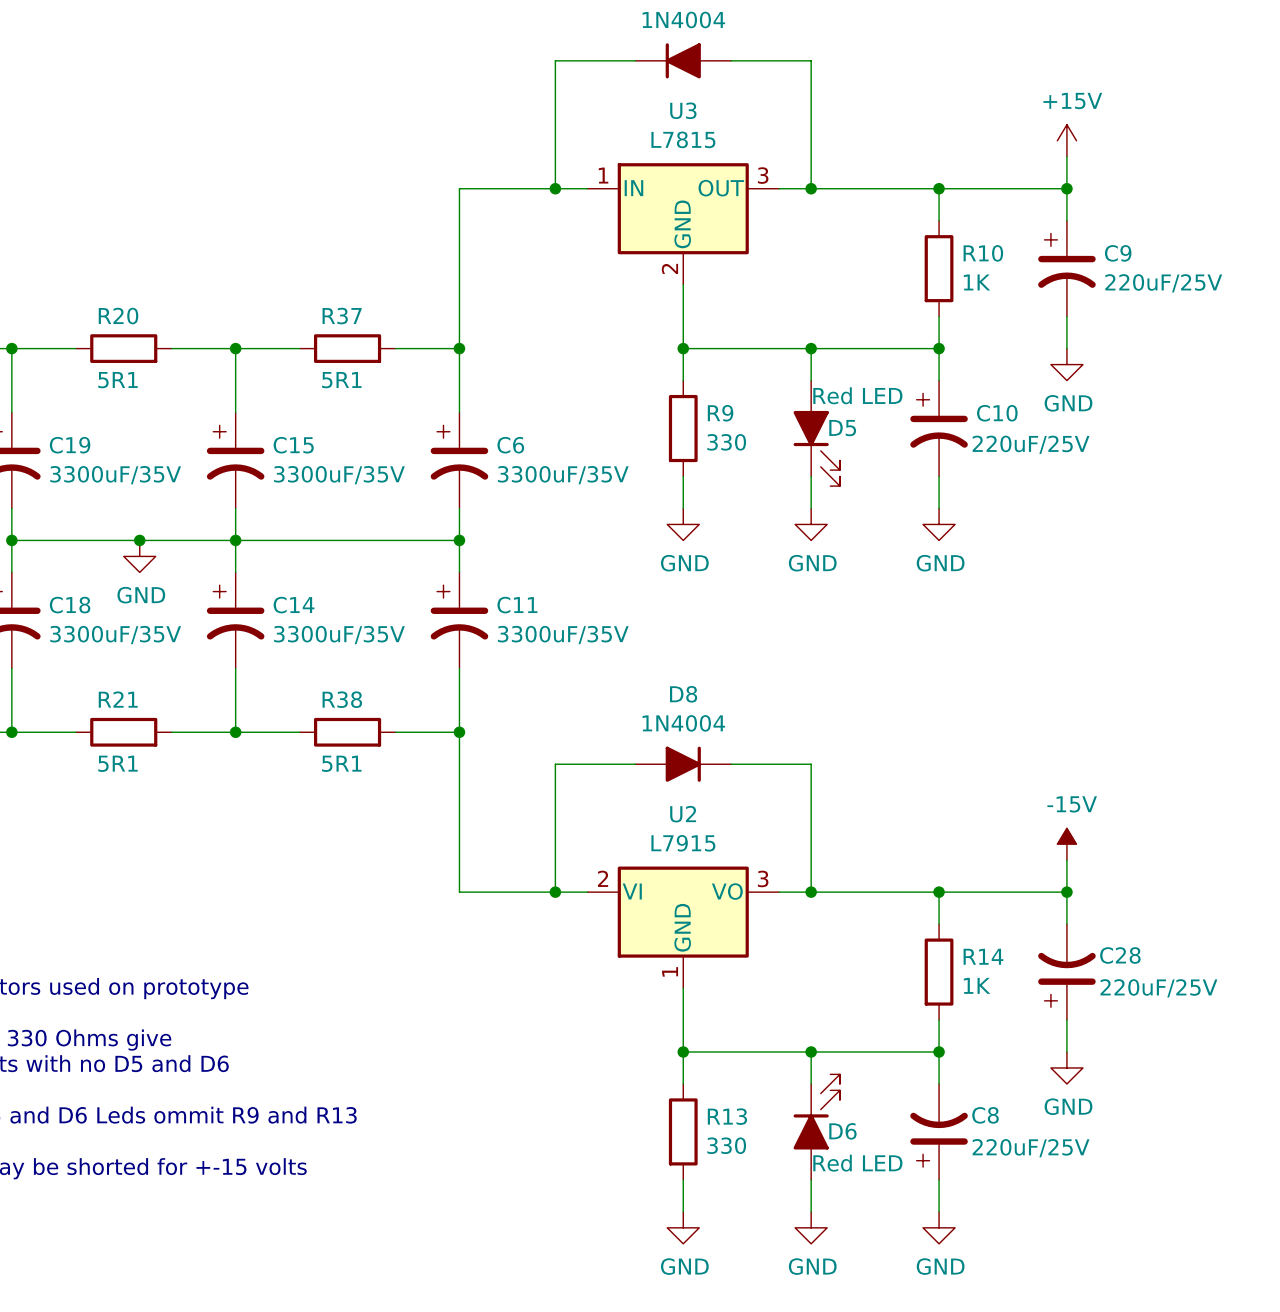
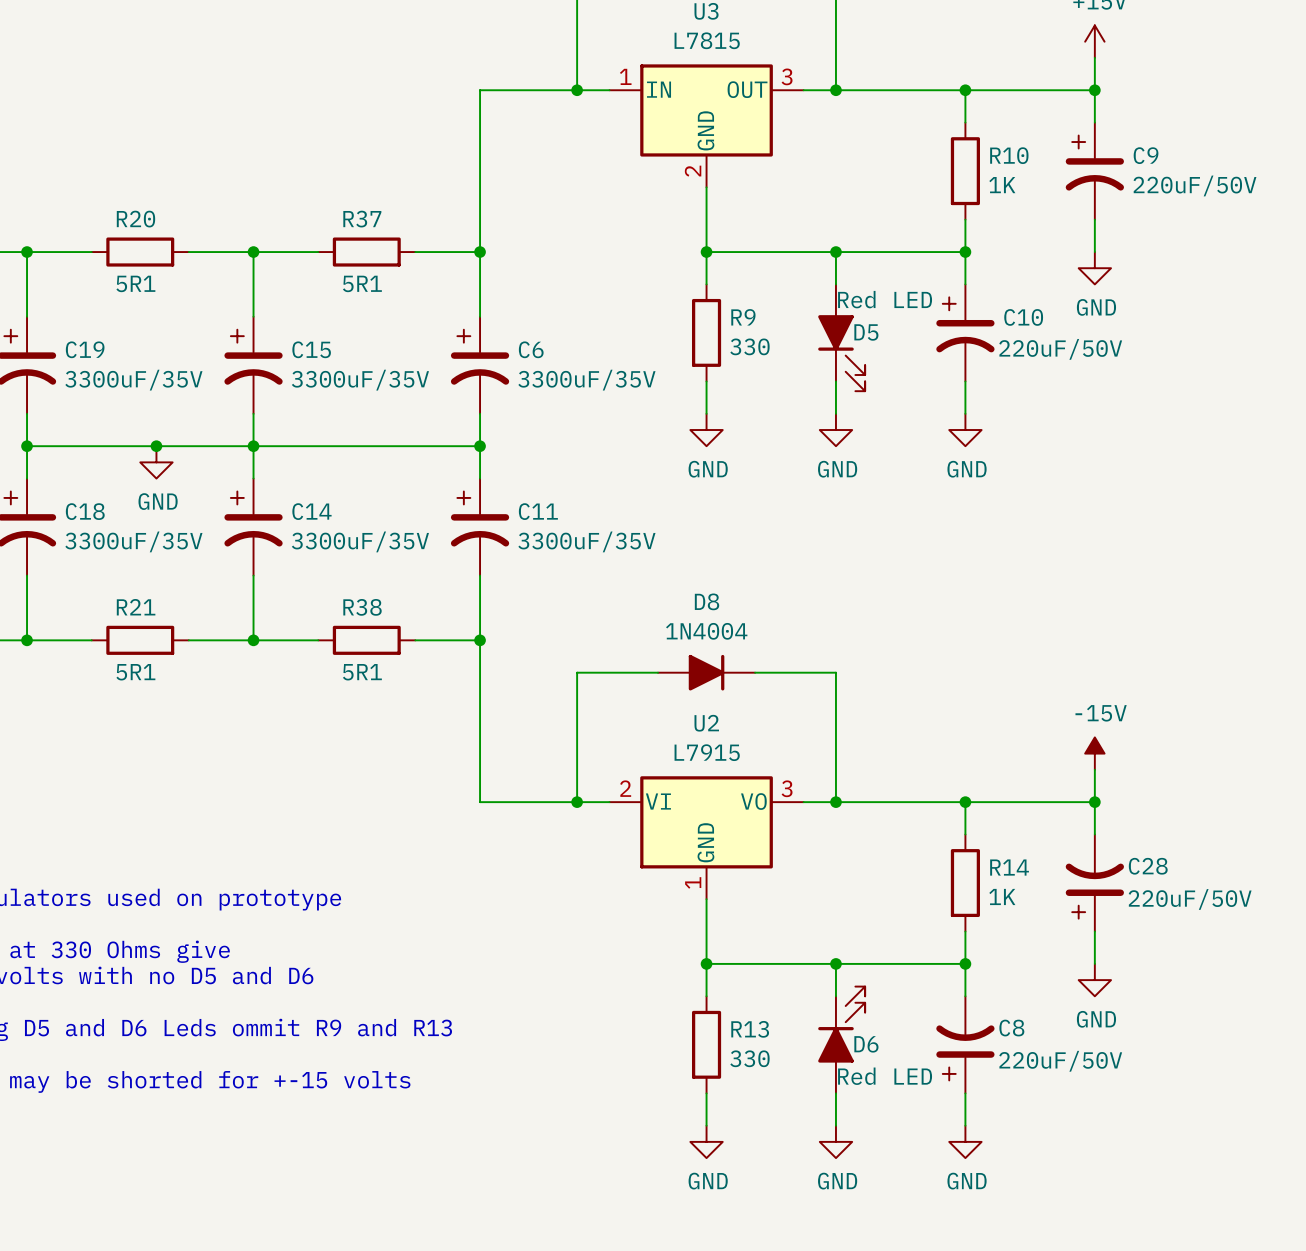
C9 value: 220uF/25V (1163, 283) -> 220uF/50V (1194, 185)
C10 value: 220uF/25V (1031, 444) -> 220uF/50V (1060, 349)
C28 value: 220uF/25V (1158, 988) -> 220uF/50V (1190, 899)
C8 value: 220uF/25V (1031, 1148) -> 220uF/50V (1060, 1061)

